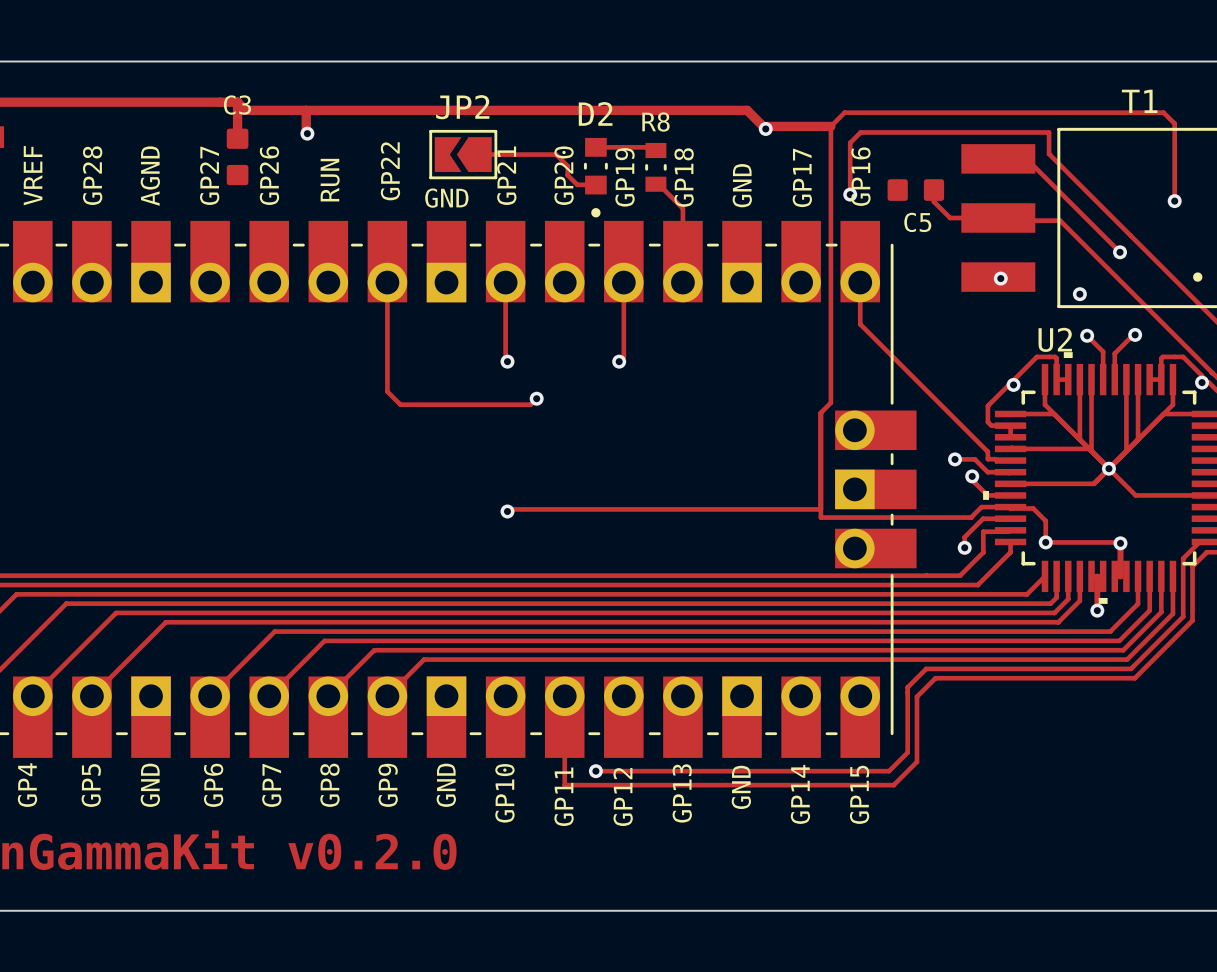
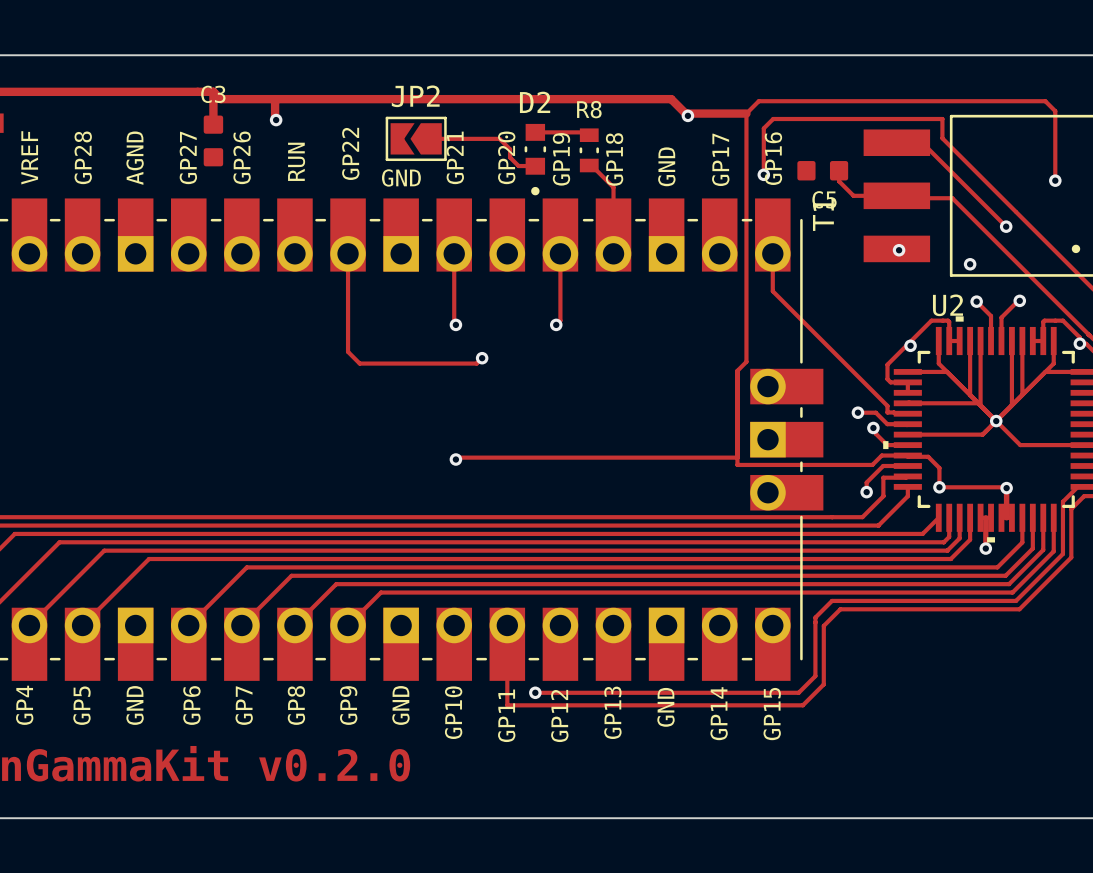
T1 name rotation: 0° (1139, 101) -> 90° counterclockwise (823, 214)
T1 name position: T1 (1139, 101) -> T1 (823, 214)

